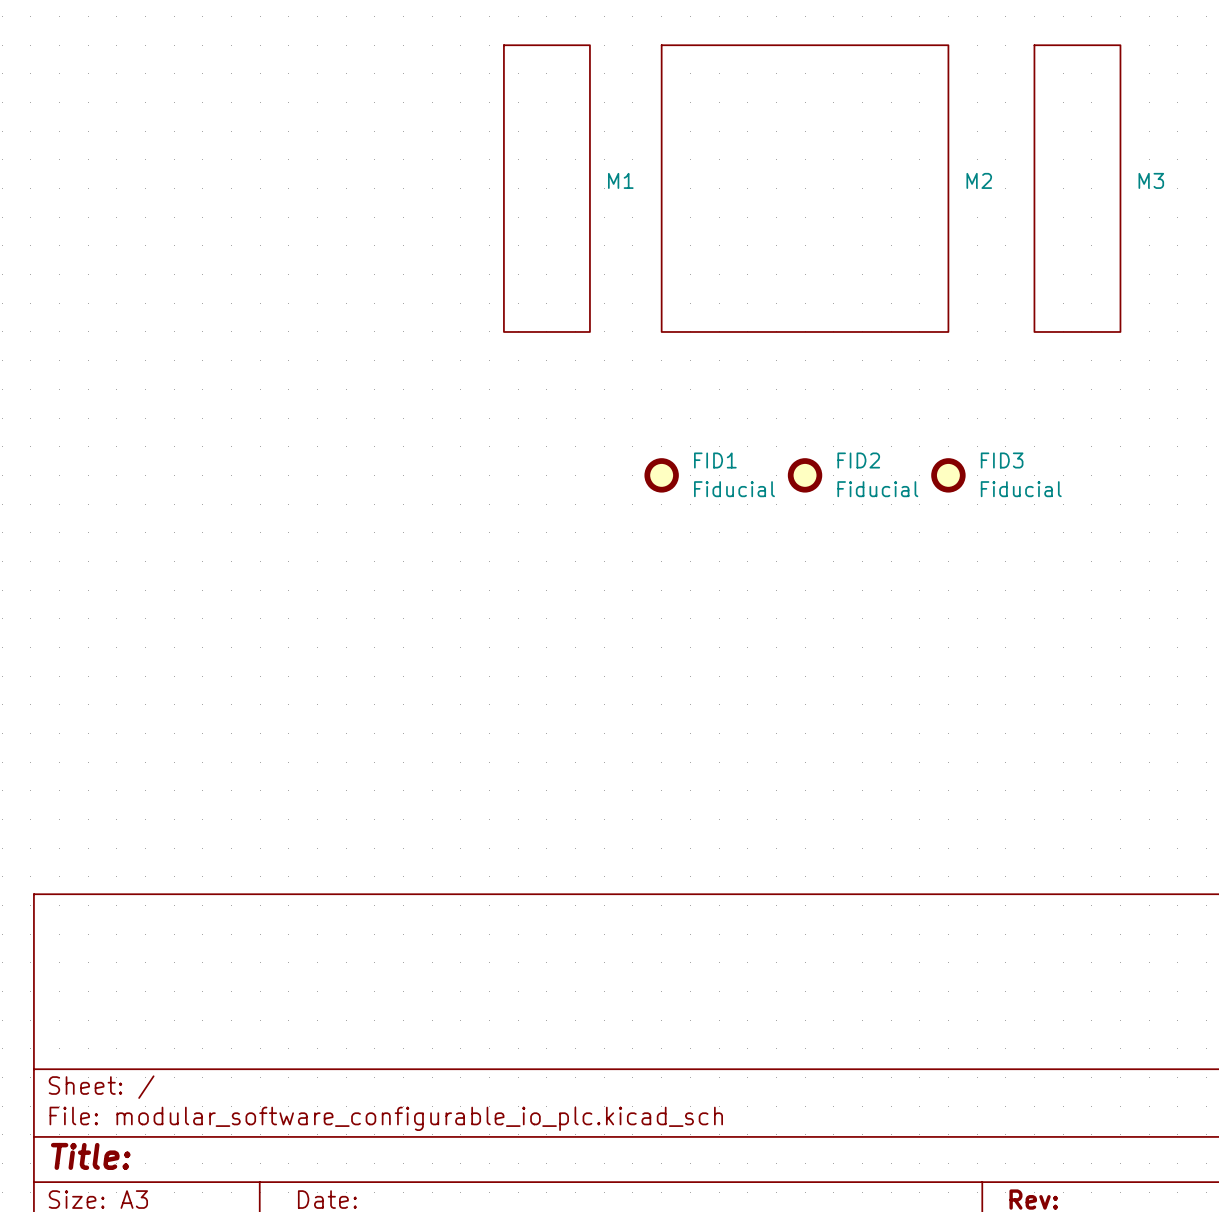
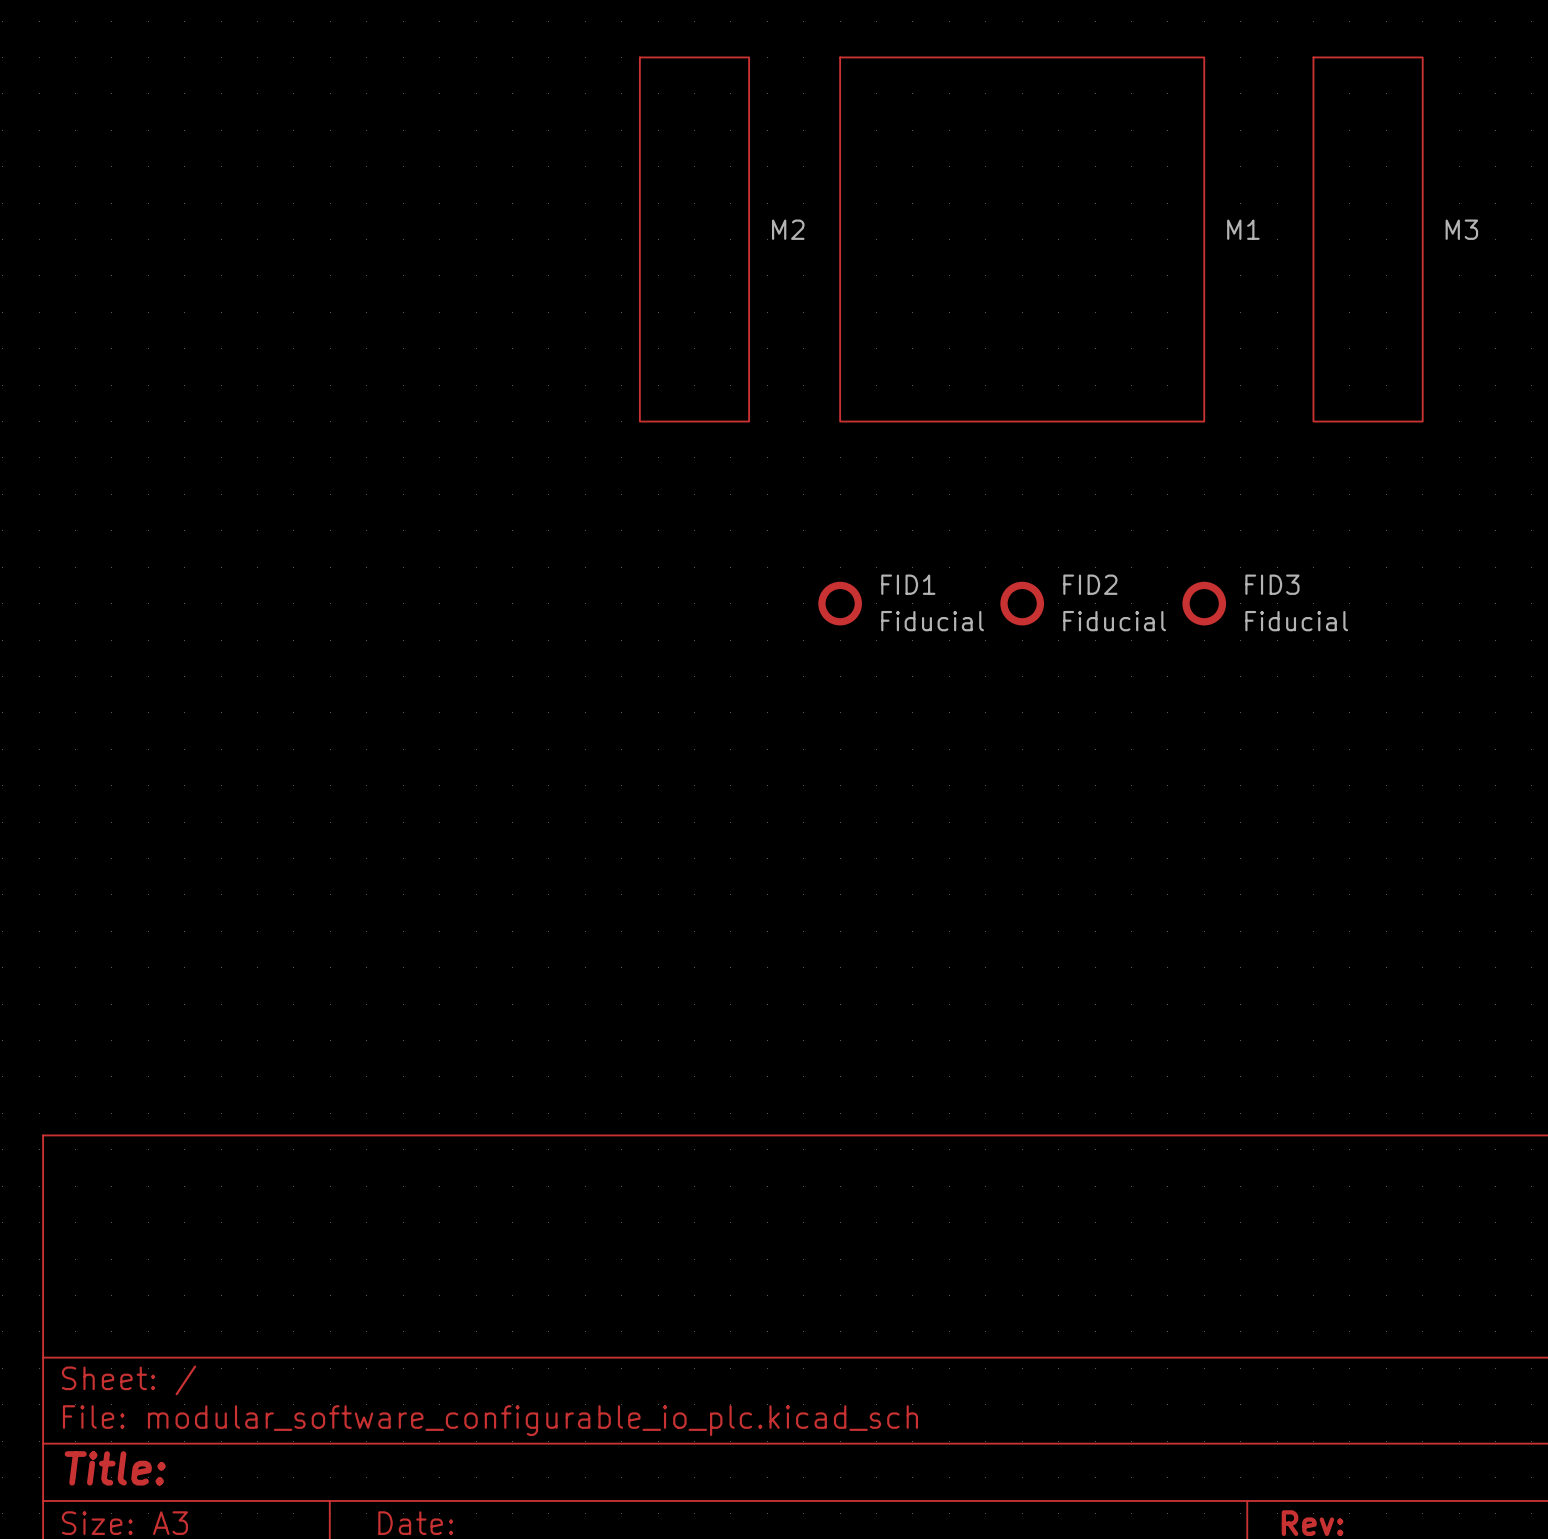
M1 name: M1 (620, 180) -> M2 (788, 229)
M2 name: M2 (979, 180) -> M1 (1243, 229)

